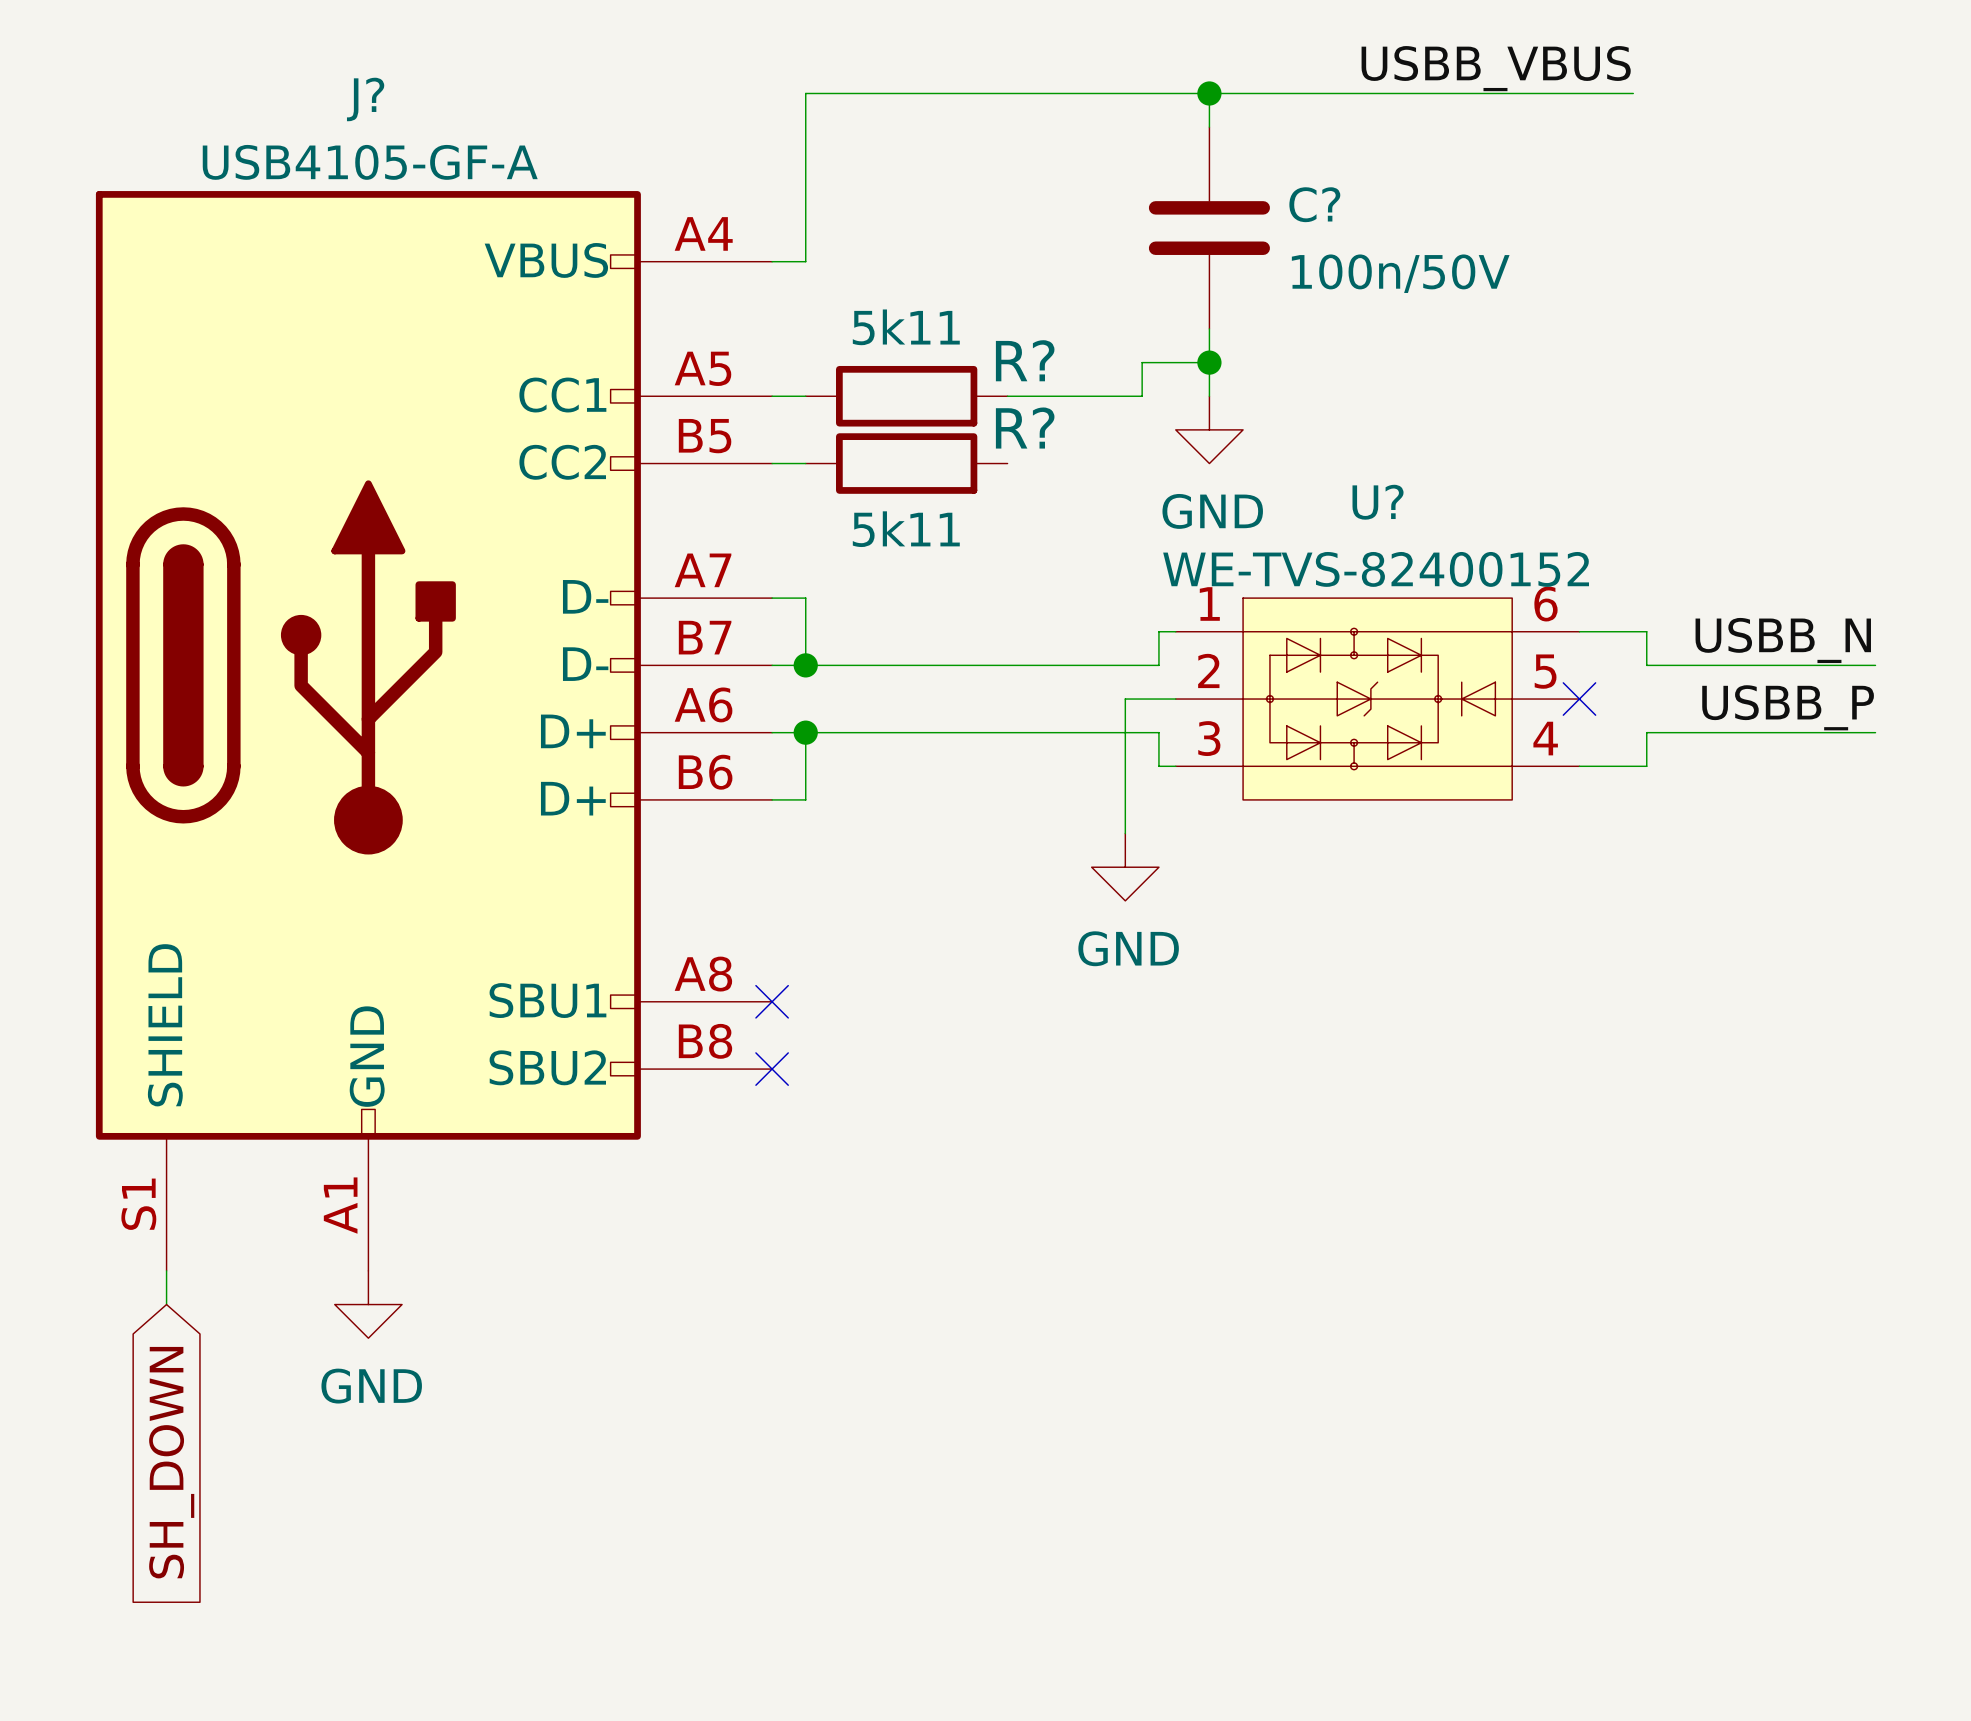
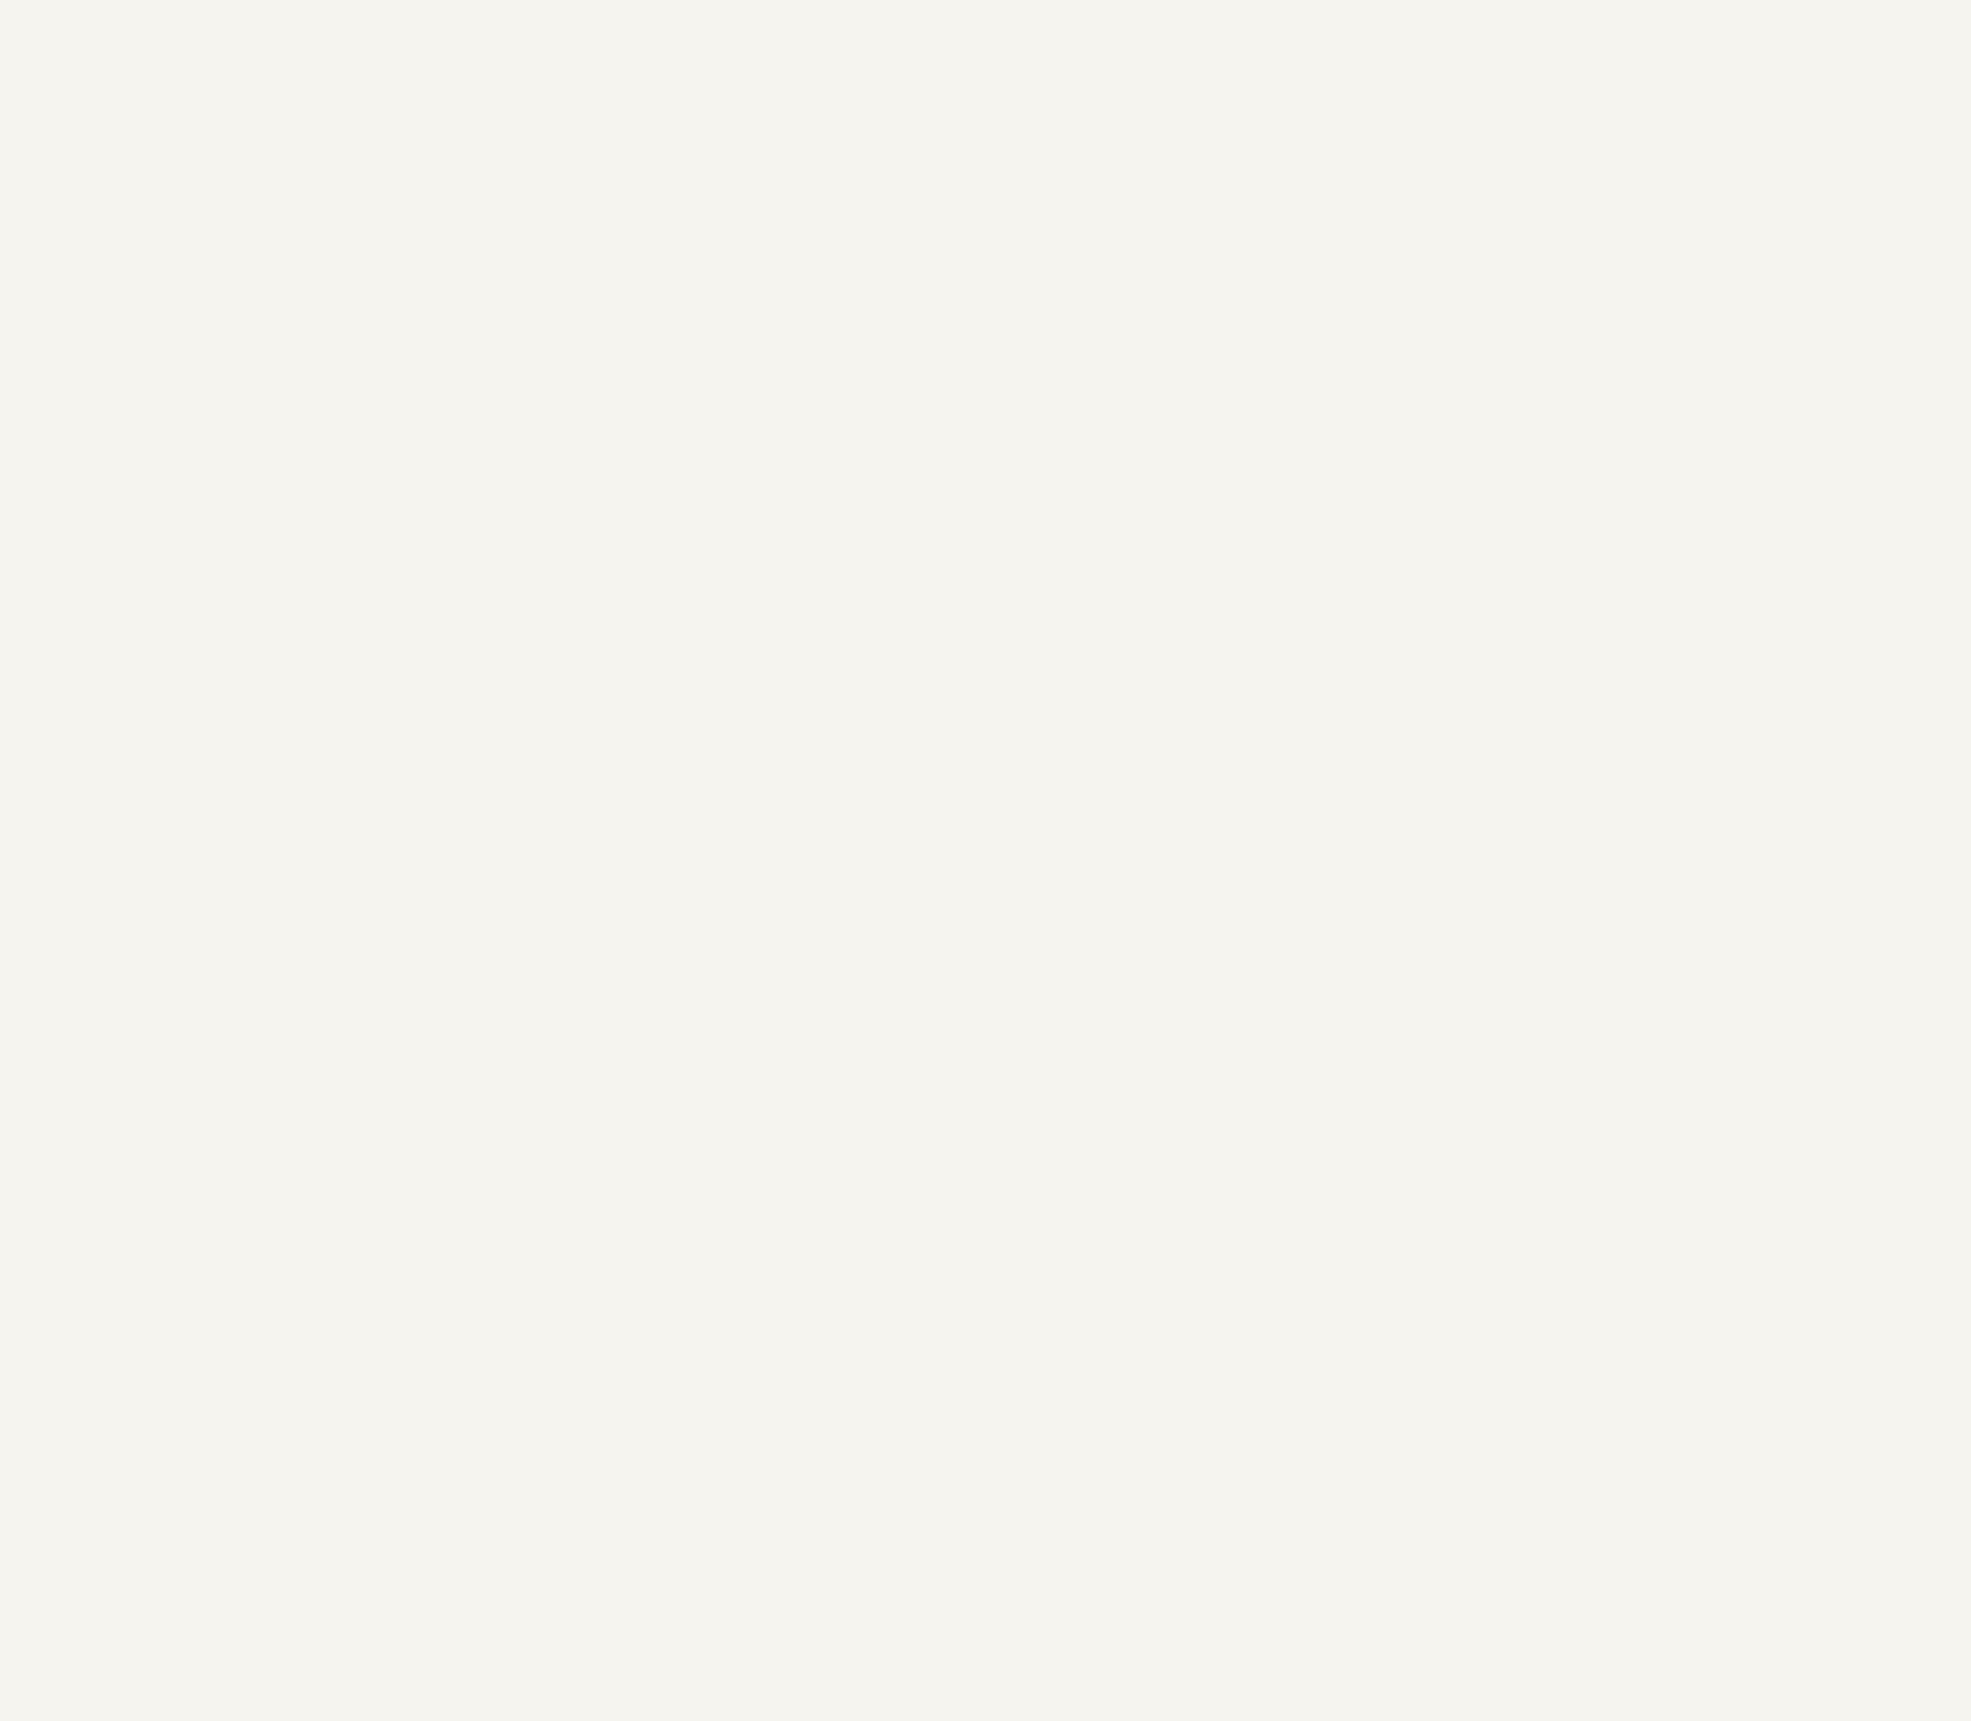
label: USBB_VBUS (1496, 68) -> none
wire: (1209, 93) (1209, 127) -> none
junction: (1209, 93) -> none
wire: (1633, 93) (805, 93) (805, 261) (772, 261) -> none
C?: (1209, 228) -> none
wire: (1209, 328) (1209, 396) -> none
wire: (1209, 362) (1142, 362) (1142, 396) (1007, 396) -> none
junction: (1209, 362) -> none
wire: (772, 396) (805, 396) -> none
R?: (906, 396) -> none
power symbol: GND (1209, 429) -> none
wire: (772, 463) (805, 463) -> none
R?: (906, 463) -> none
wire: (772, 598) (805, 598) (805, 665) -> none
wire: (1175, 631) (1158, 631) (1158, 665) (772, 665) -> none
wire: (1579, 631) (1646, 631) (1646, 665) (1875, 665) -> none
label: USBB_N (1783, 640) -> none
junction: (805, 665) -> none
wire: (1175, 699) (1125, 699) (1125, 833) -> none
U?: WE-TVS-82400152 (1377, 699) -> none
no-connect mark: (1579, 699) -> none
label: USBB_P (1788, 707) -> none
J?: USB4105-GF-A (434, 730) -> none
wire: (772, 732) (1158, 732) (1158, 766) (1175, 766) -> none
wire: (805, 732) (805, 799) (772, 799) -> none
junction: (805, 732) -> none
wire: (1875, 732) (1646, 732) (1646, 766) (1579, 766) -> none
power symbol: GND (1125, 867) -> none
no-connect mark: (772, 1001) -> none
no-connect mark: (772, 1069) -> none
wire: (166, 1270) (166, 1304) -> none
power symbol: GND (368, 1304) -> none
global label: SH_DOWN (171, 1462) -> none

